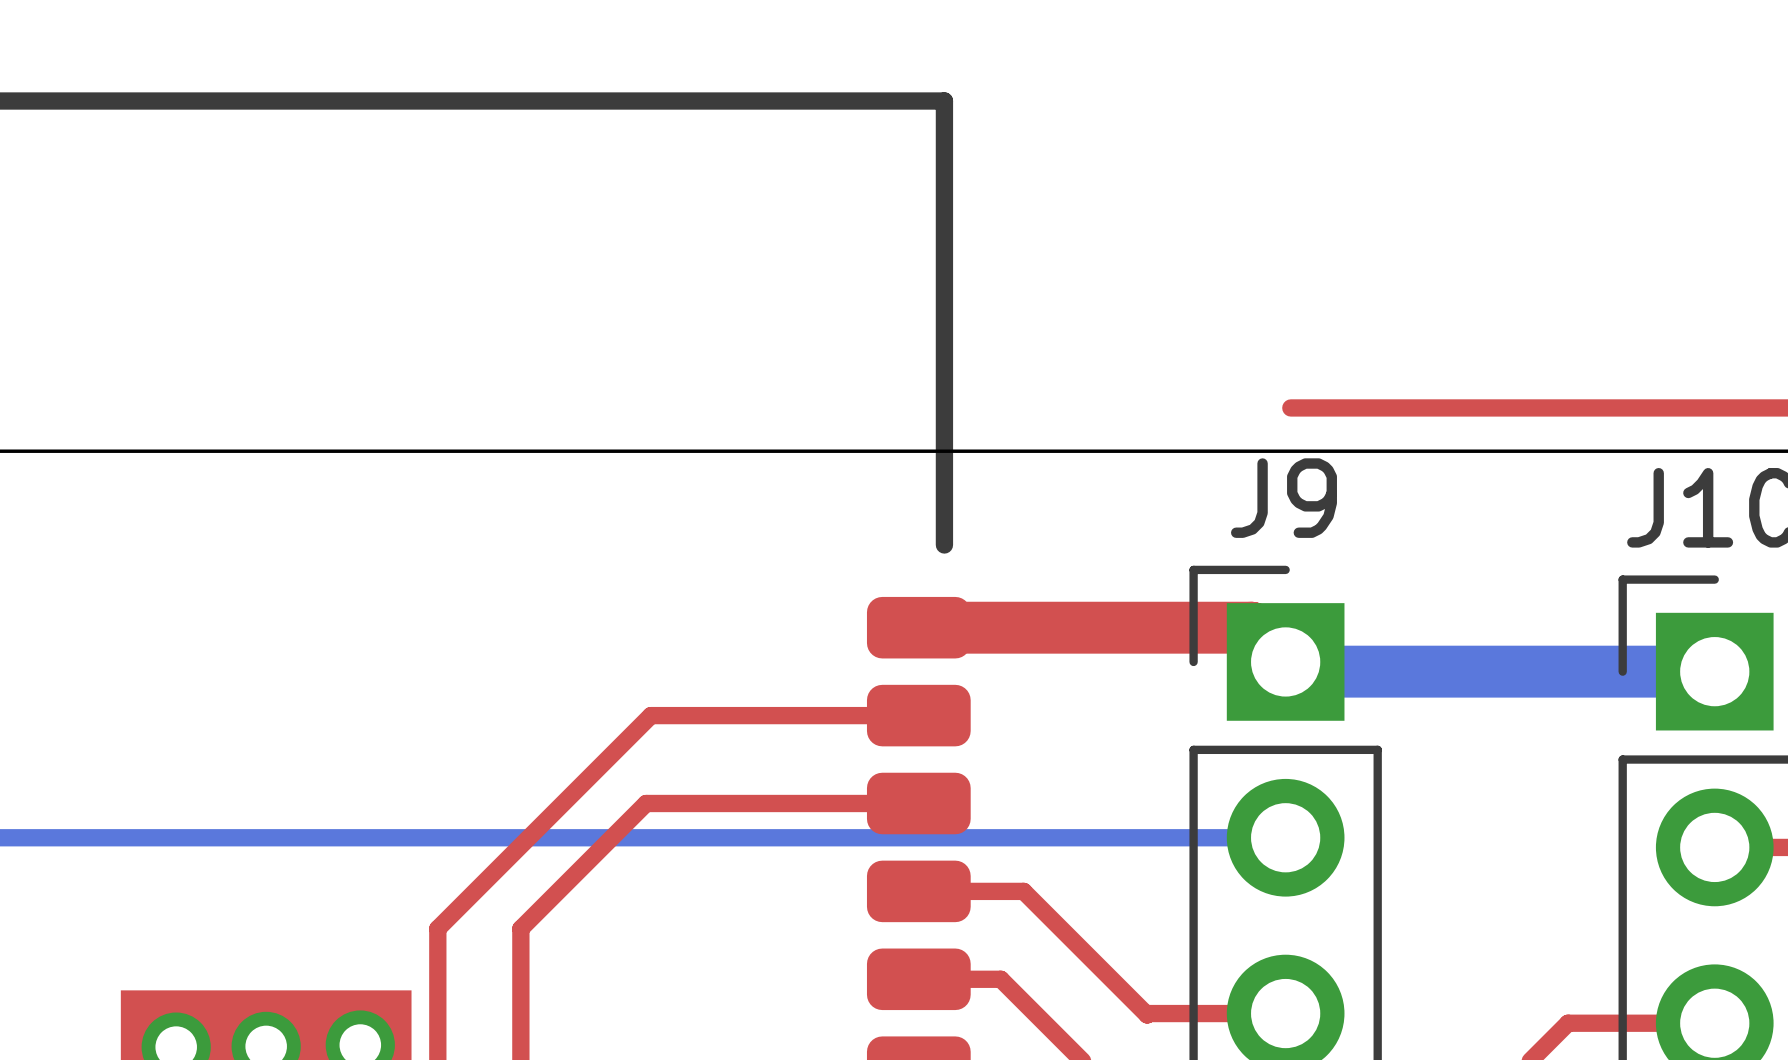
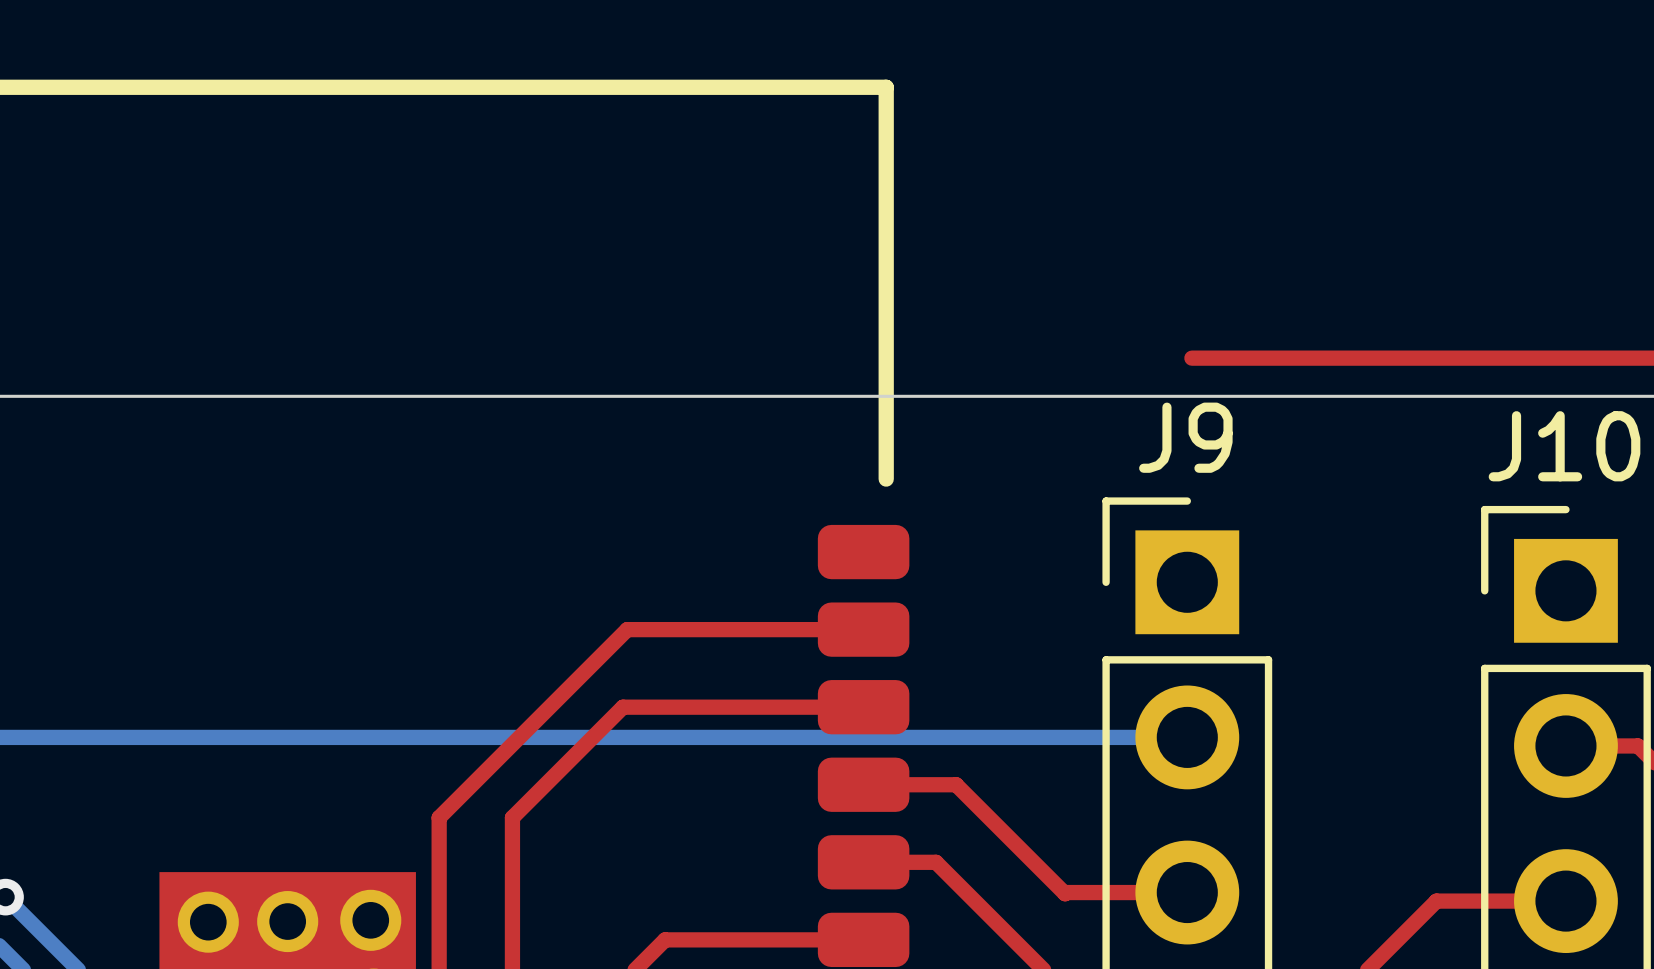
top track: (918, 627) (1251, 627) (1285, 661) -> none
bottom track: (1285, 661) (1295, 671) (1714, 671) -> none

